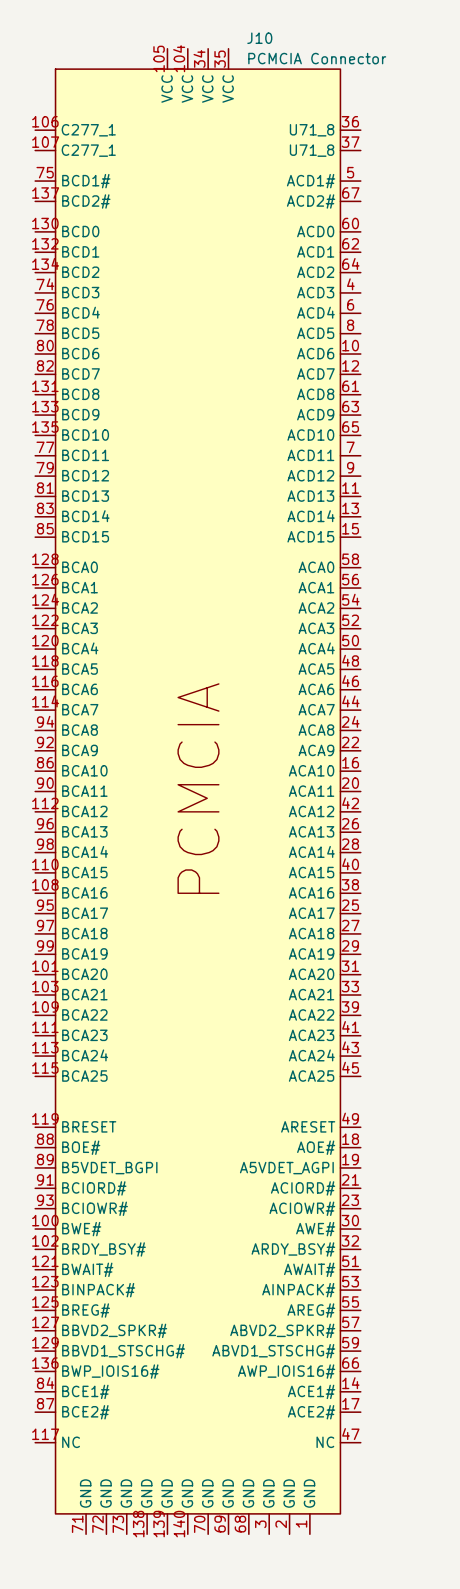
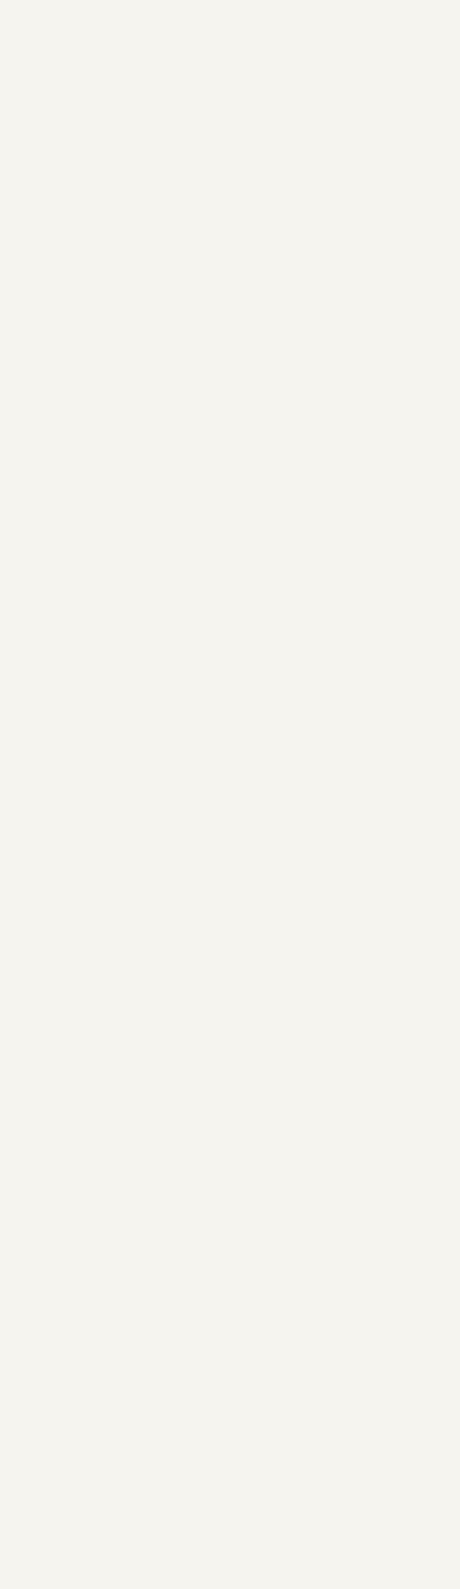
J10: PCMCIA Connector (197, 791) -> none

